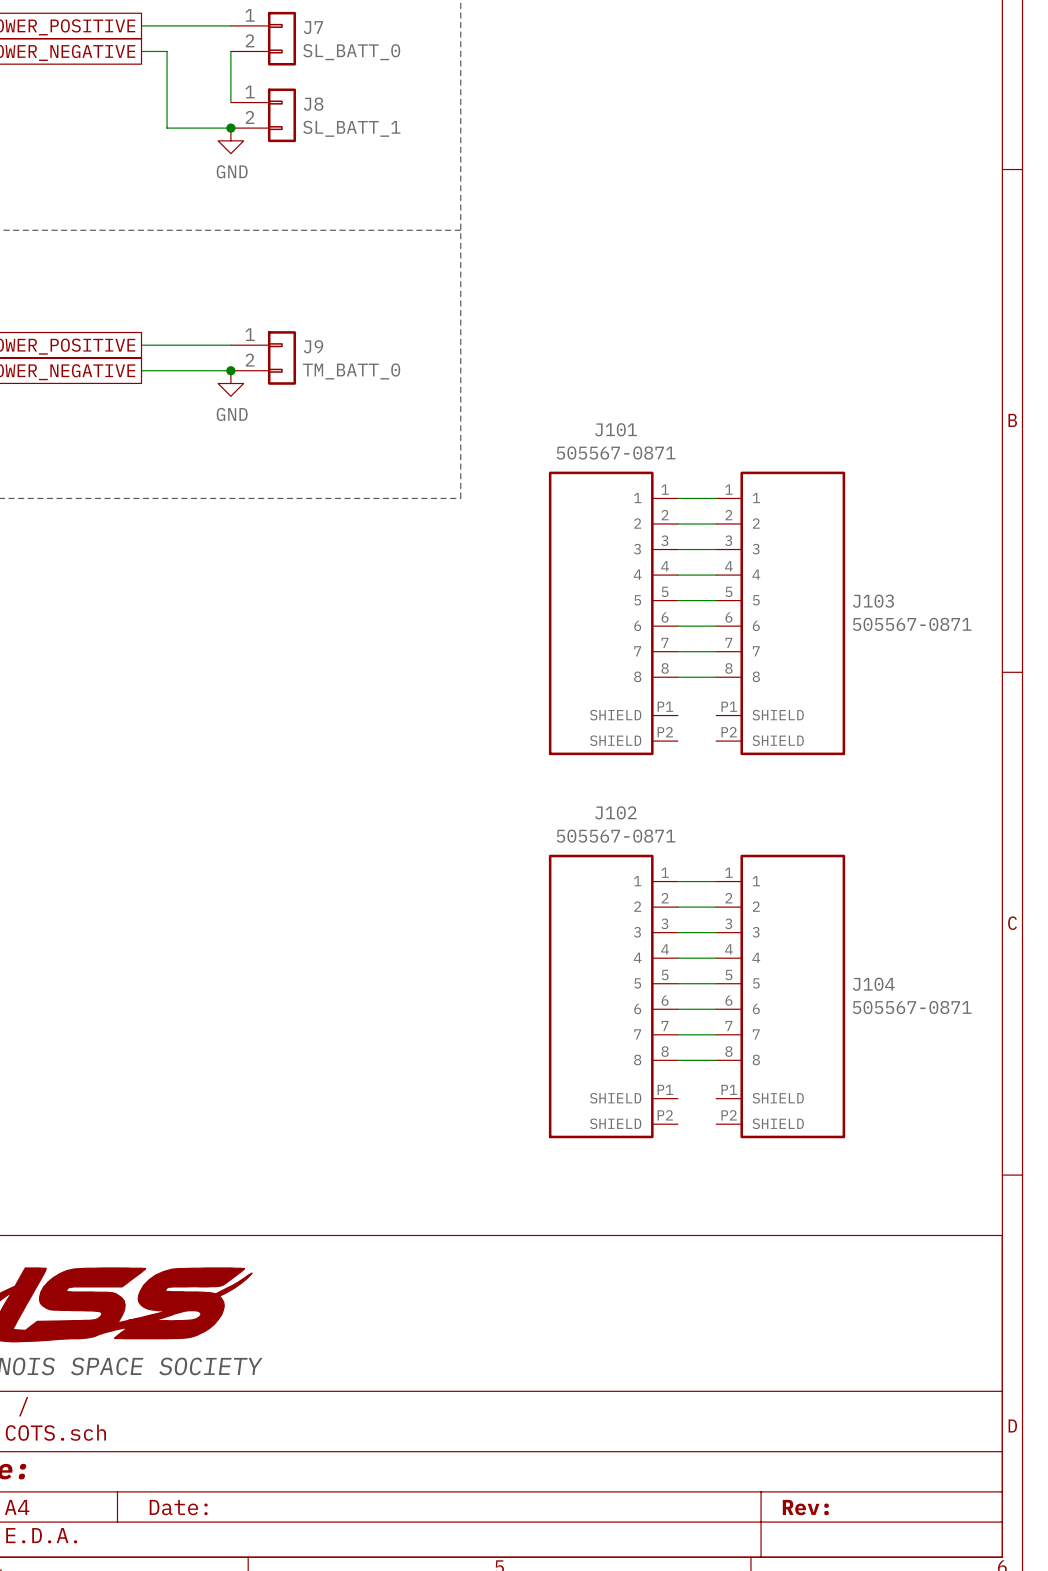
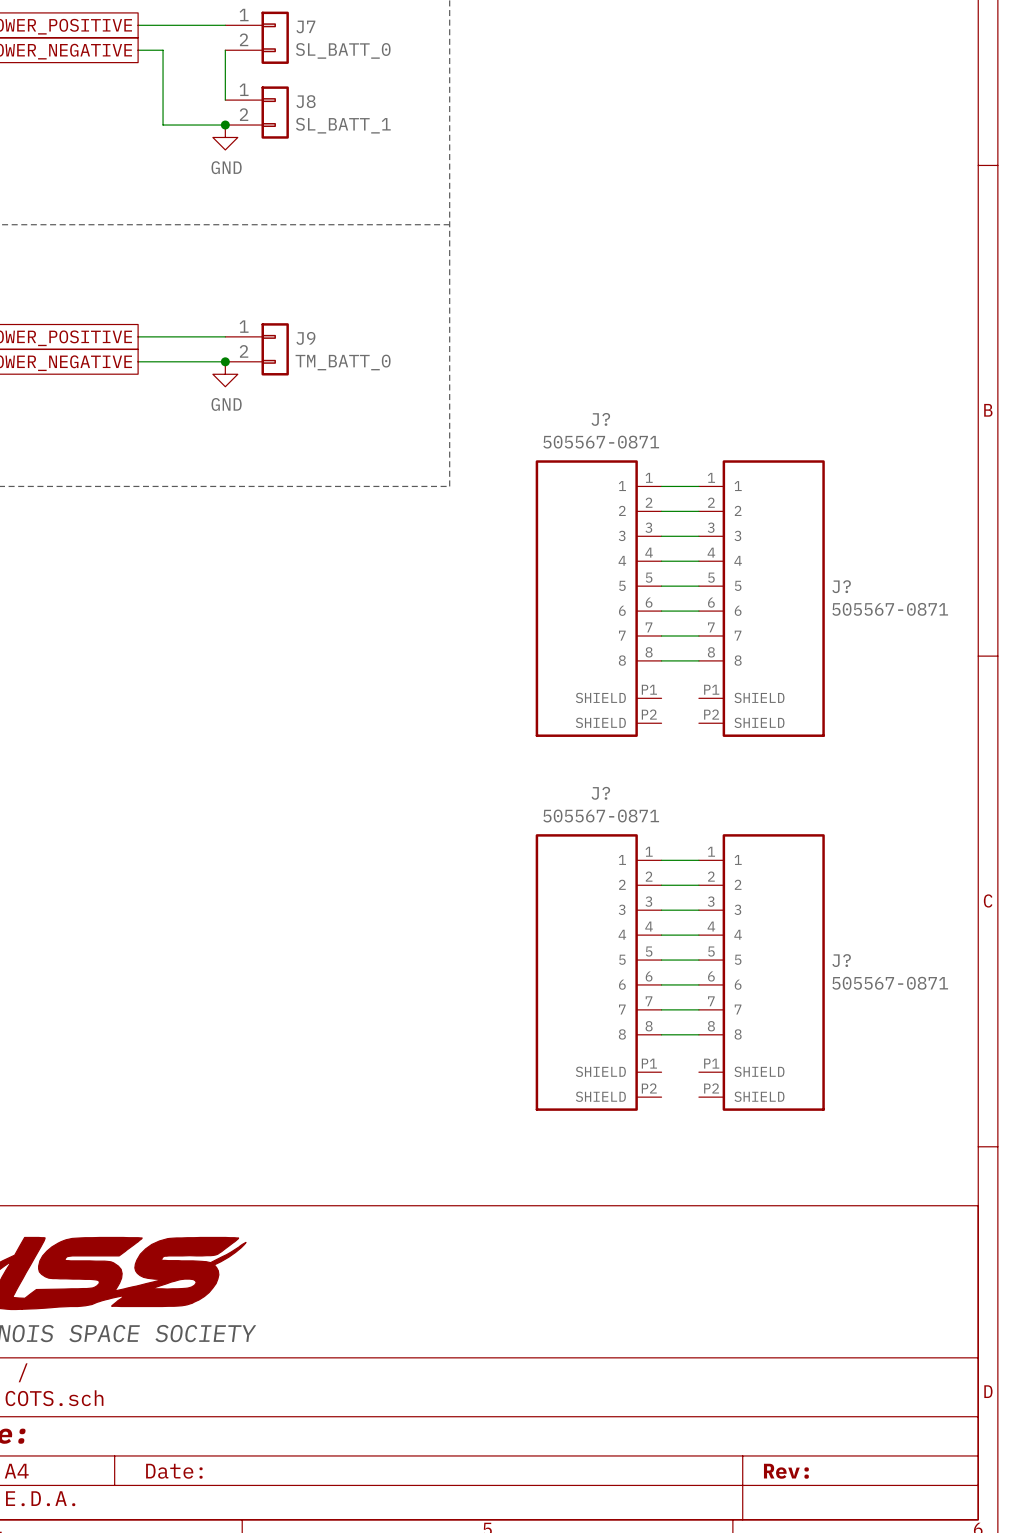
J101 name: J101 (616, 429) -> J? (600, 419)
J103 name: J103 (873, 601) -> J? (841, 586)
J102 name: J102 (615, 812) -> J? (600, 793)
J104 name: J104 (873, 984) -> J? (841, 960)

